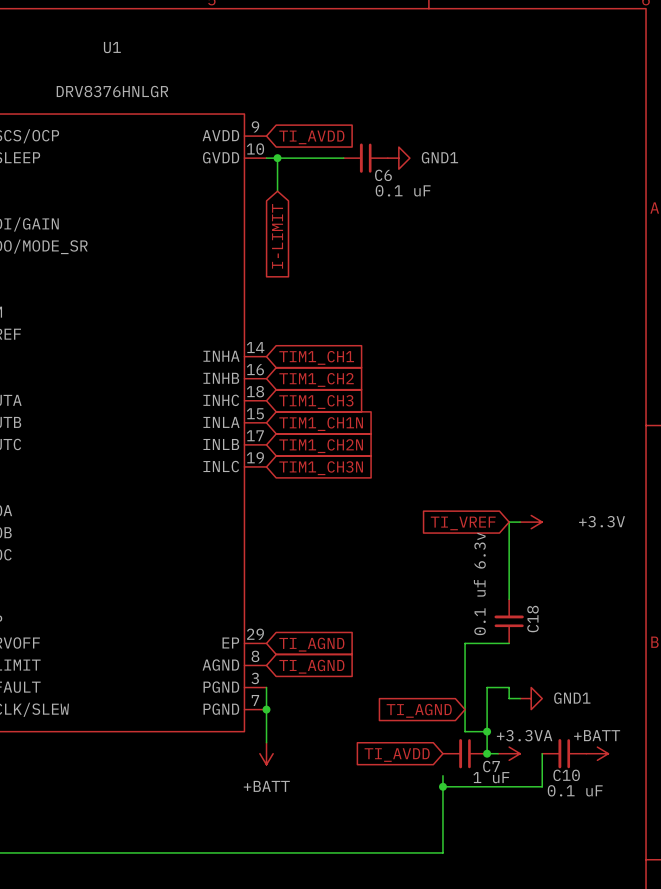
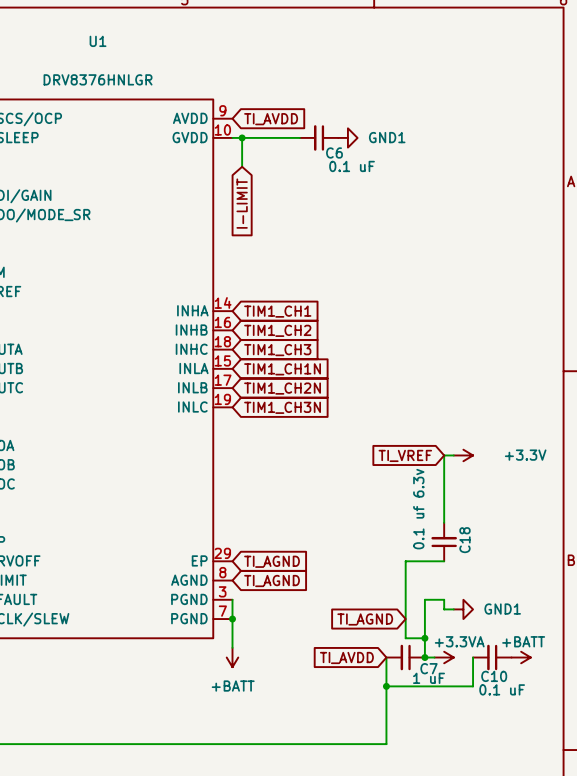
wire: none -> (386, 657) (386, 676)

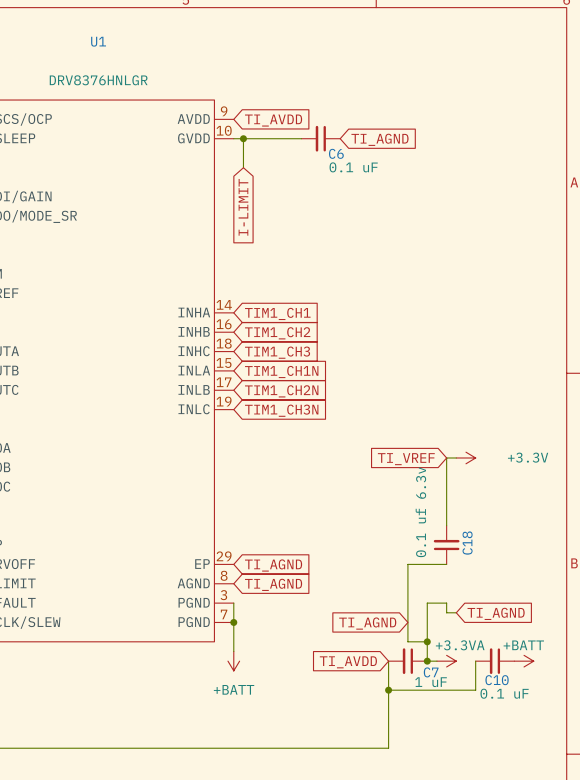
power symbol: GND1 (347, 137) -> none
global label: none -> TI_AGND (379, 139)
power symbol: GND1 (463, 609) -> none
global label: none -> TI_AGND (496, 613)

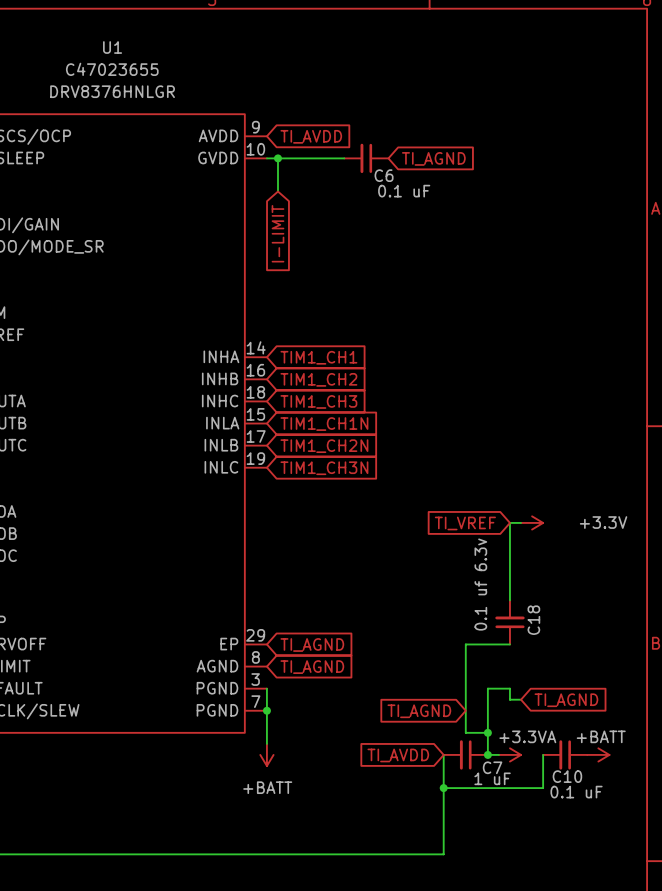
U1 value: none -> C47023655 (112, 69)

